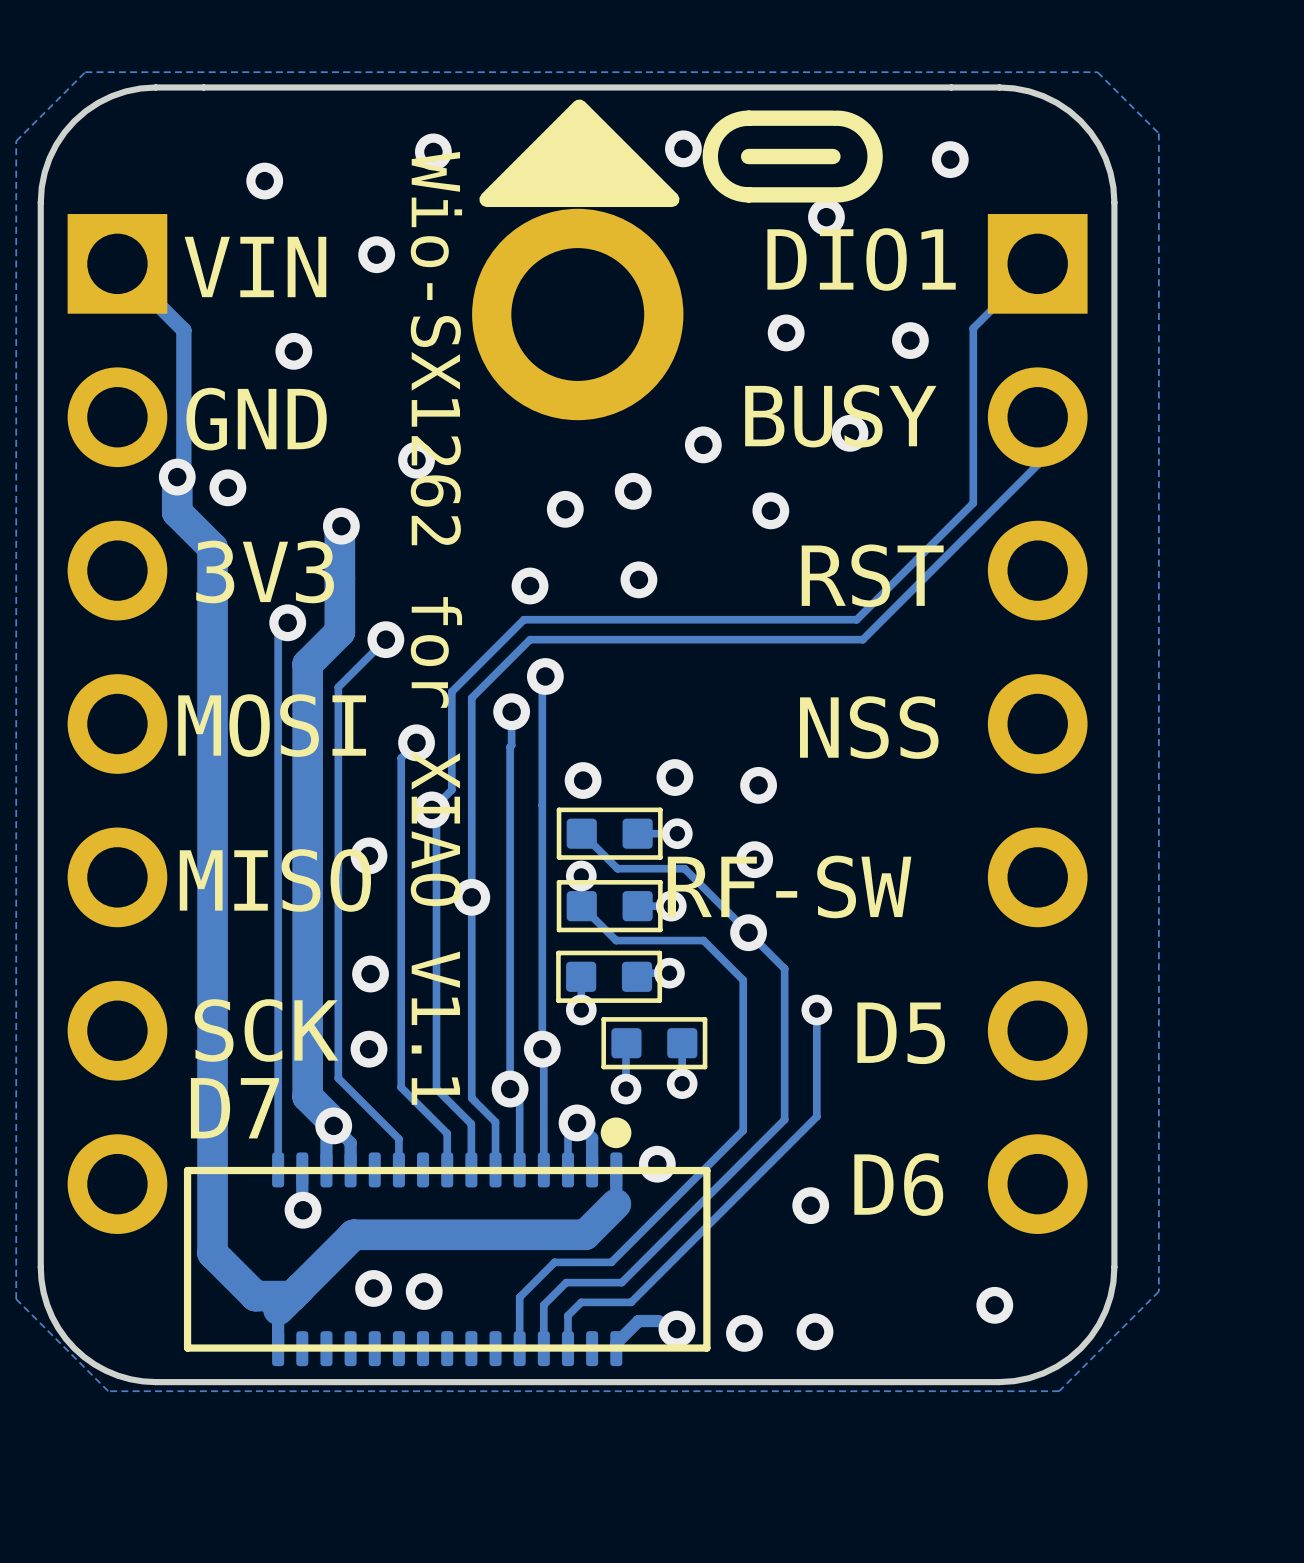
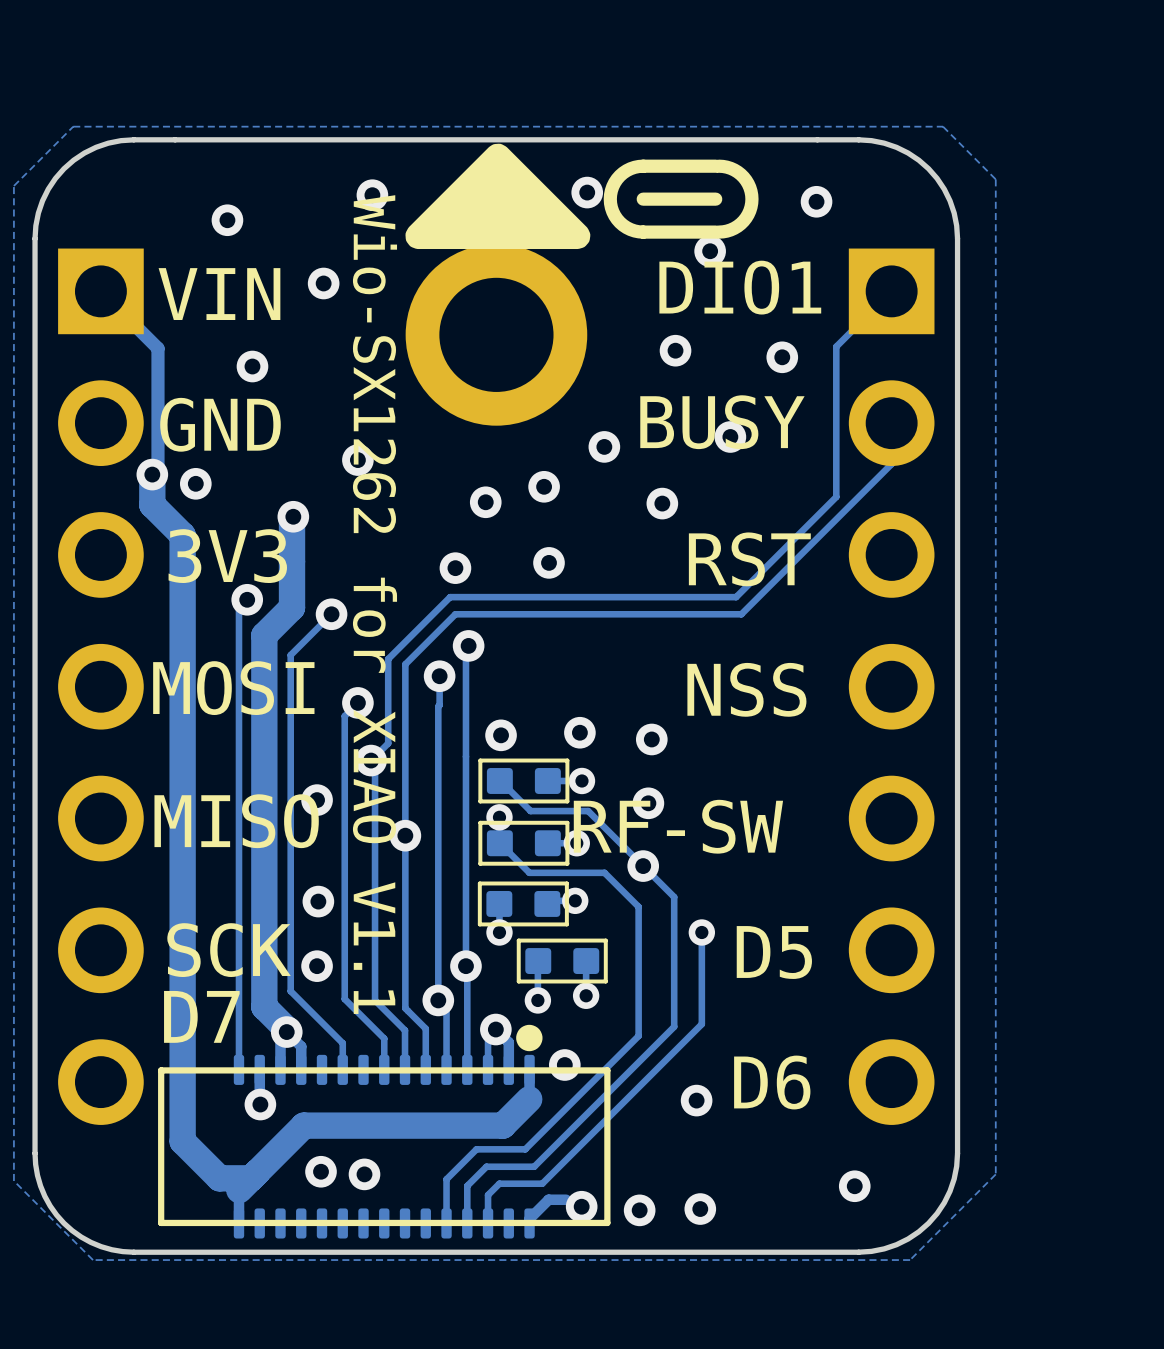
drawing shape: [479, 99, 680, 208] -> [405, 143, 591, 250]

